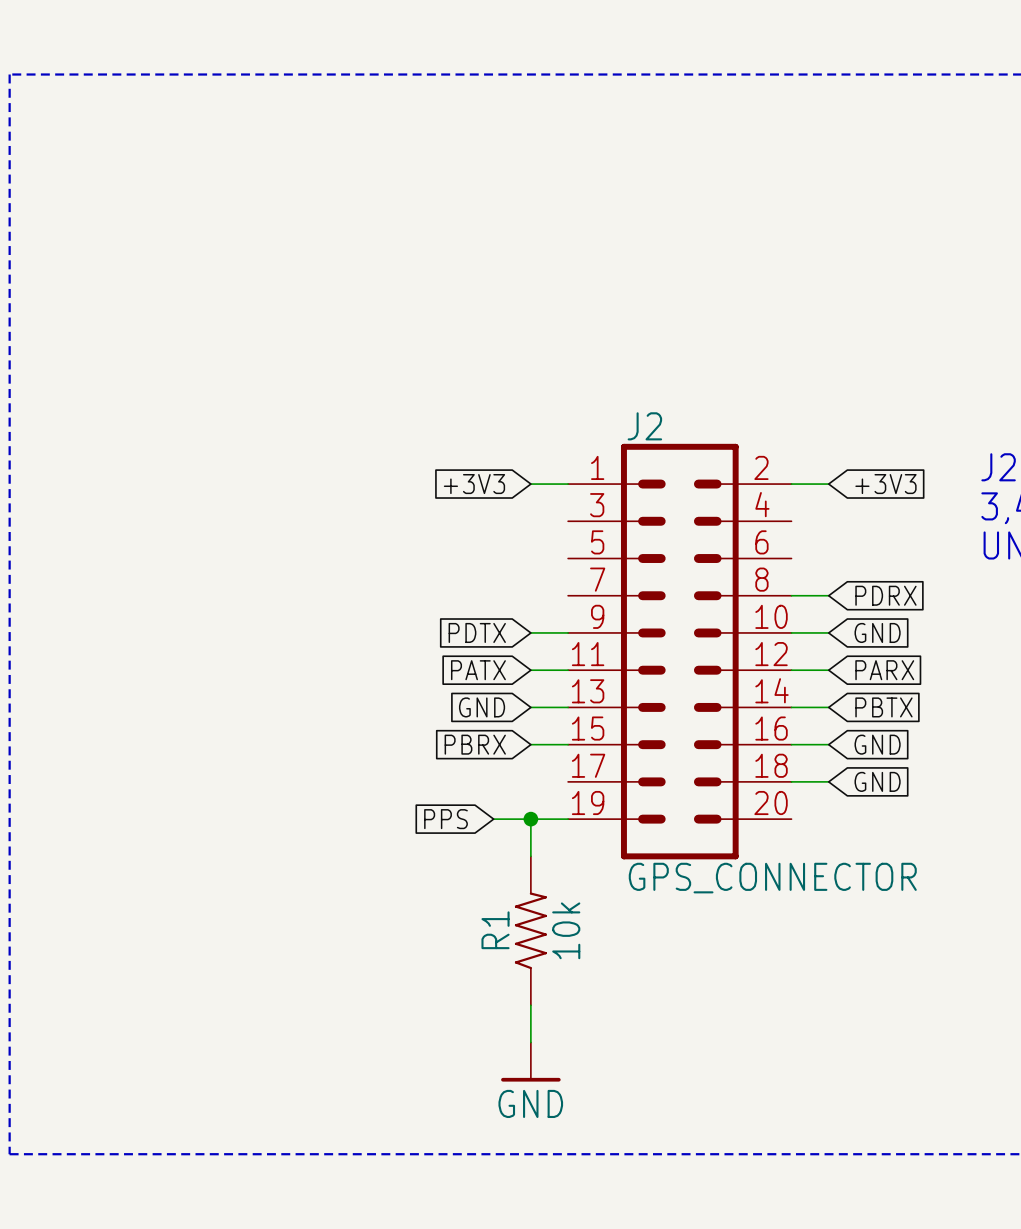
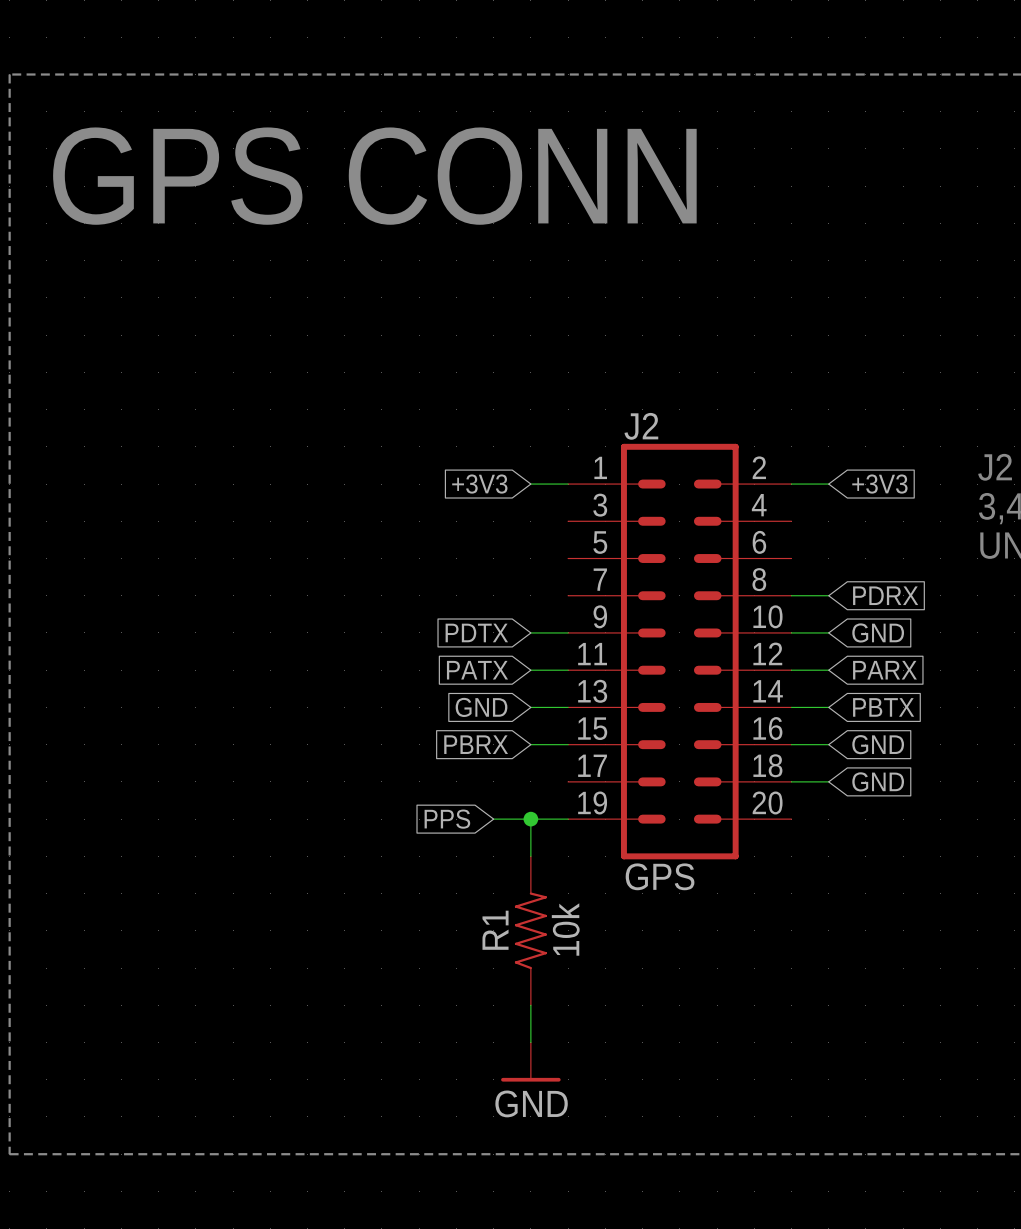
text: none -> GPS CONN (374, 176)
J2 value: GPS_CONNECTOR (772, 878) -> GPS (660, 876)

